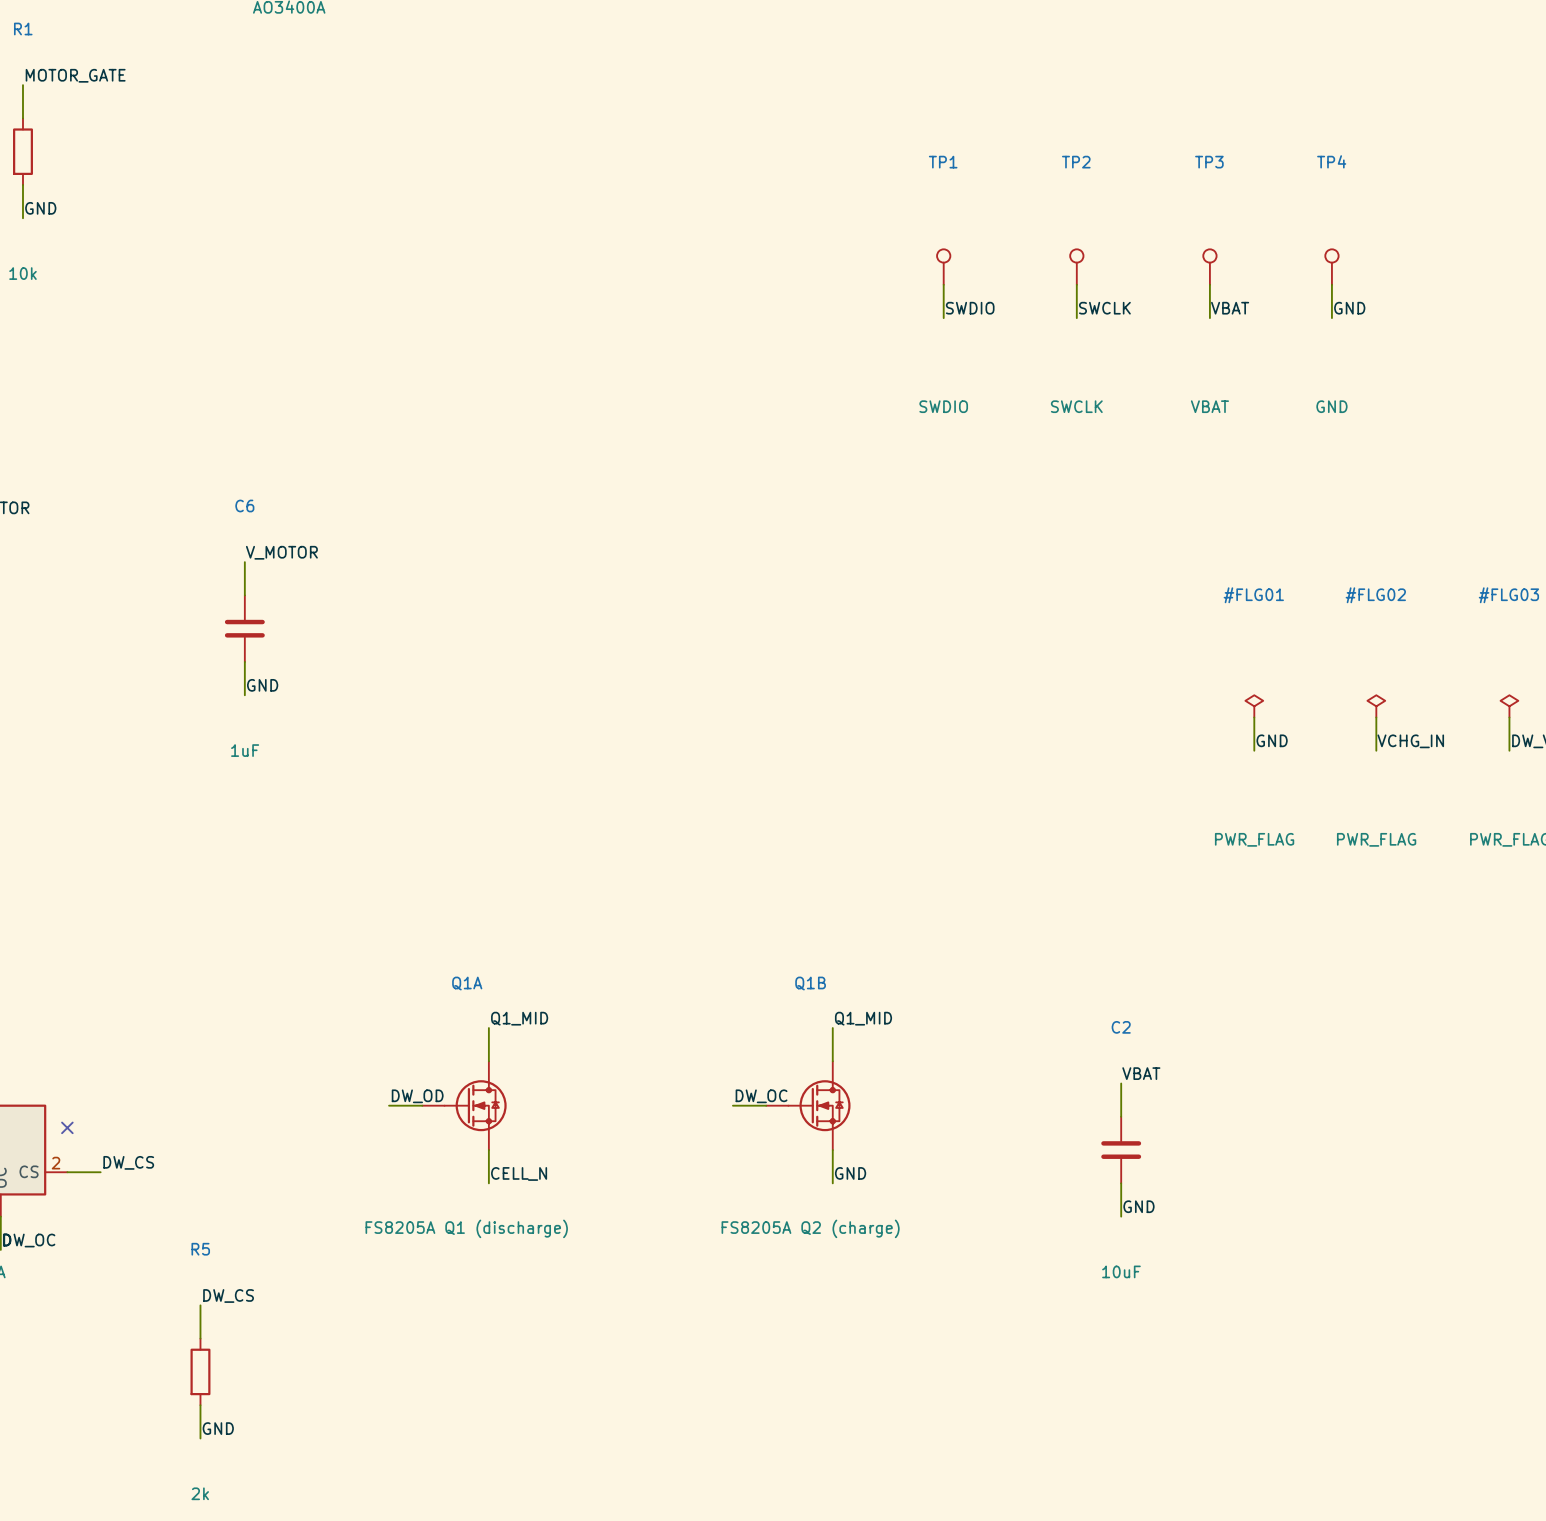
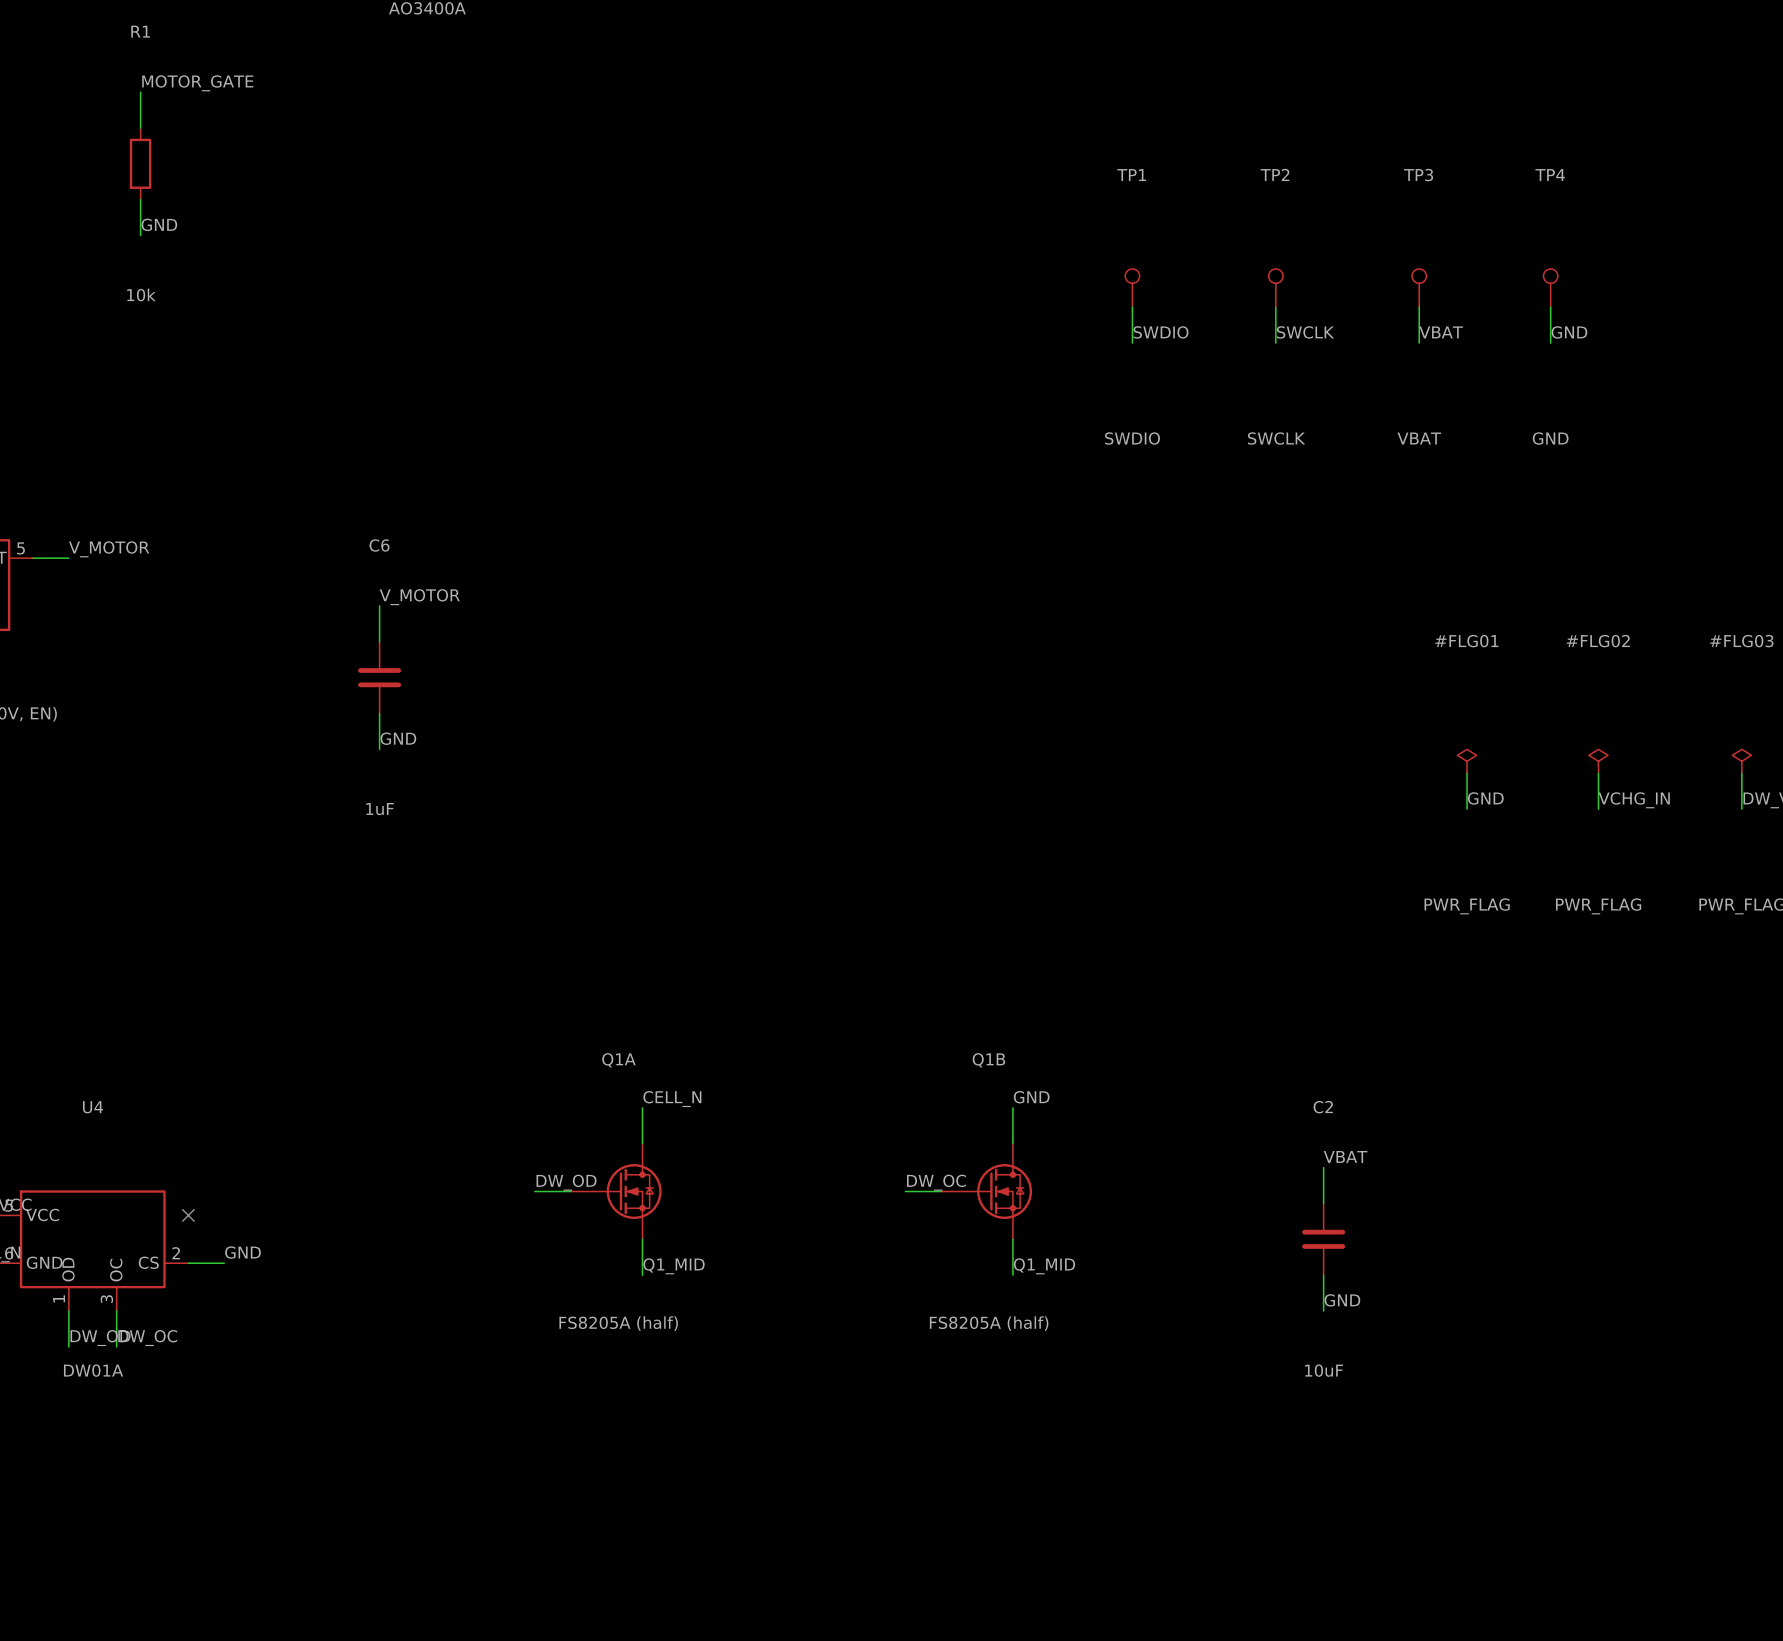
label: Q1_MID (519, 1018) -> CELL_N (672, 1099)
label: Q1_MID (863, 1018) -> GND (1031, 1097)
label: DW_CS (128, 1162) -> GND (243, 1252)
label: CELL_N (519, 1173) -> Q1_MID (674, 1266)
label: GND (850, 1173) -> Q1_MID (1044, 1266)
Q1A value: FS8205A Q1 (discharge) (466, 1228) -> FS8205A (half) (618, 1323)
Q1B value: FS8205A Q2 (charge) (810, 1228) -> FS8205A (half) (989, 1323)
label: DW_CS (228, 1295) -> none
wire: (200, 1305) (200, 1338) -> none
R5: 2k (200, 1371) -> none
wire: (200, 1405) (200, 1438) -> none
label: GND (218, 1428) -> none

